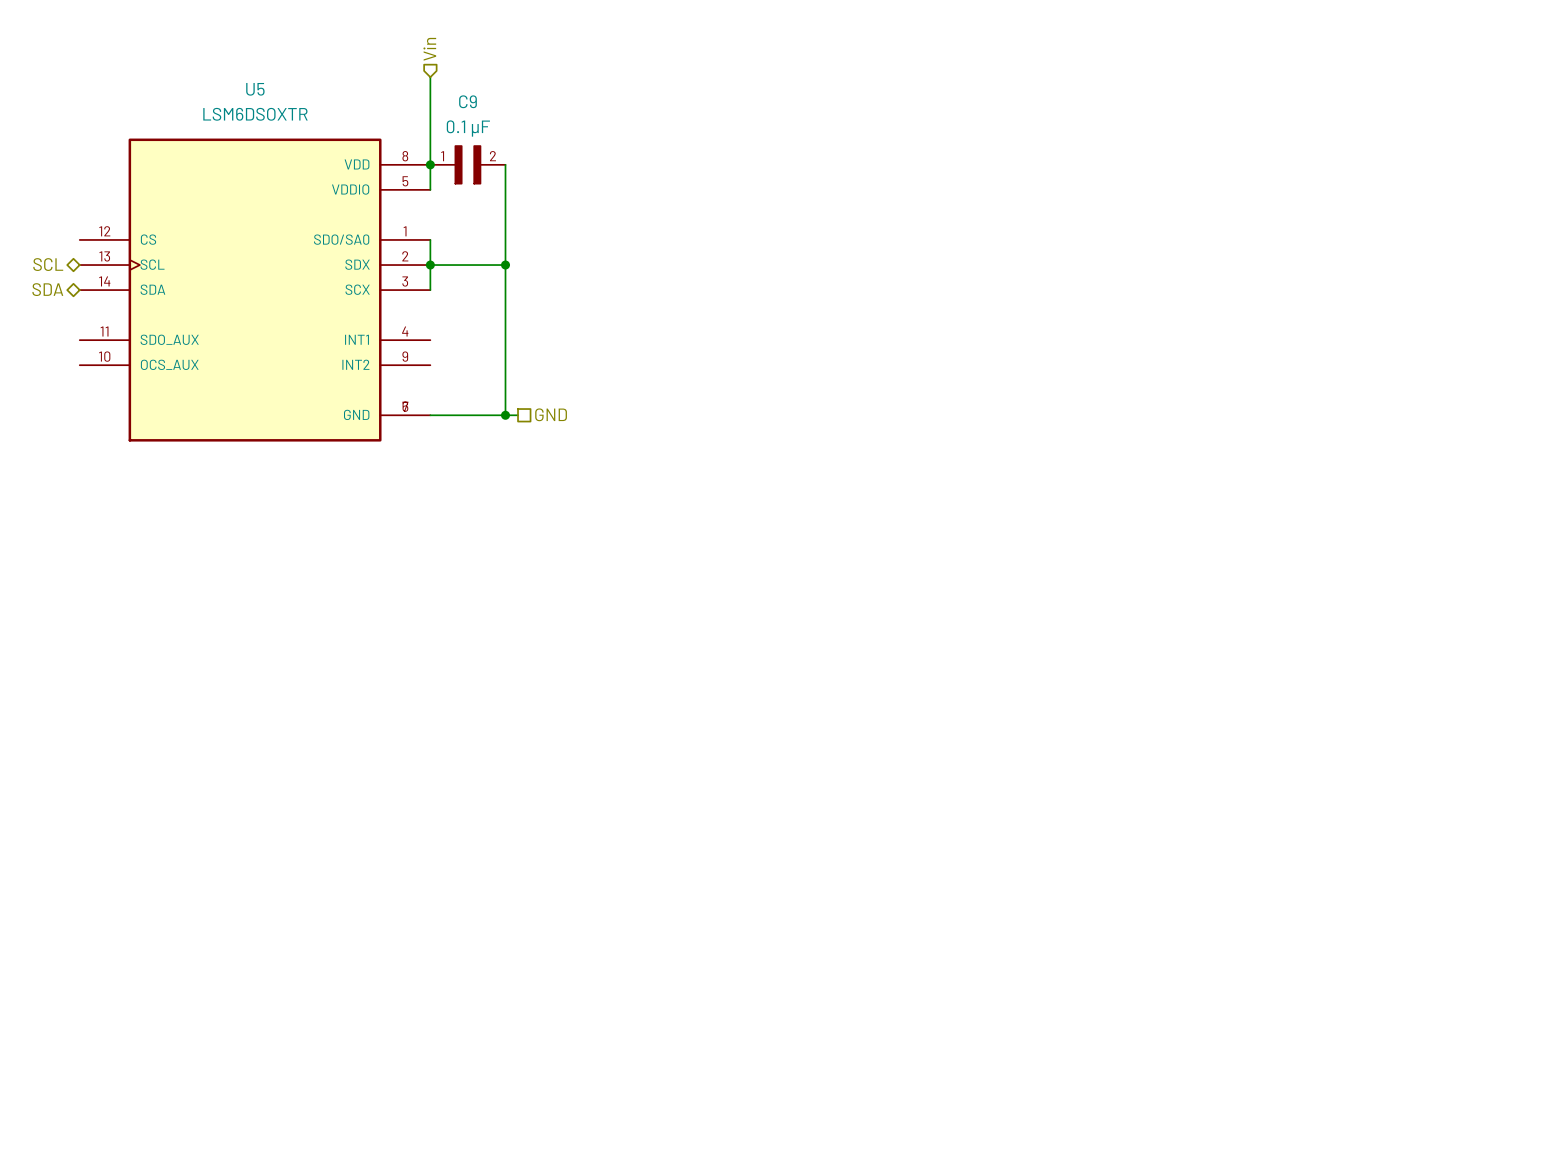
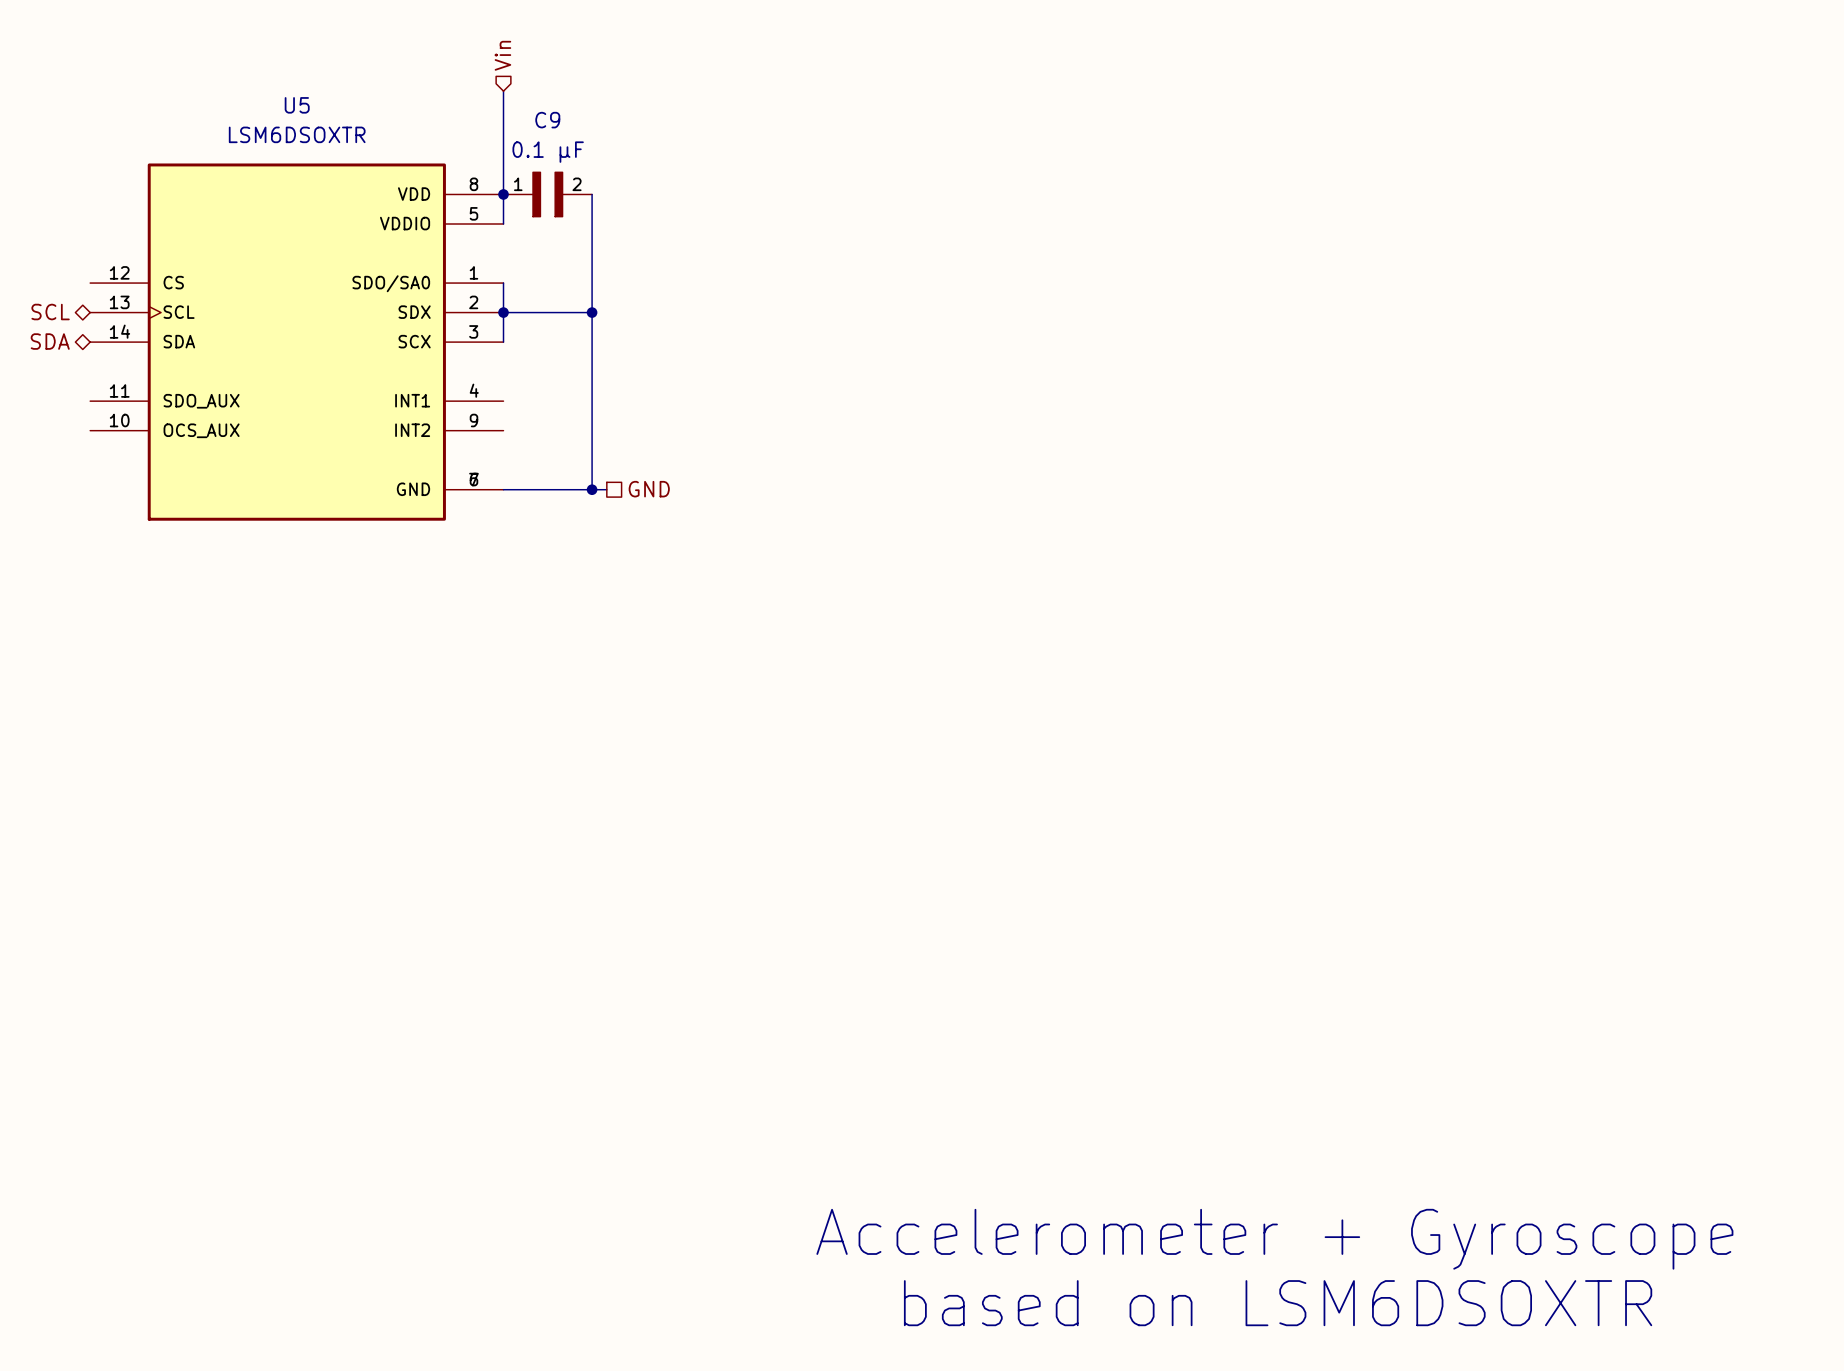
text: none -> Accelerometer + Gyroscope (1274, 1239)
text: none -> based on LSM6DSOXTR (1278, 1303)

